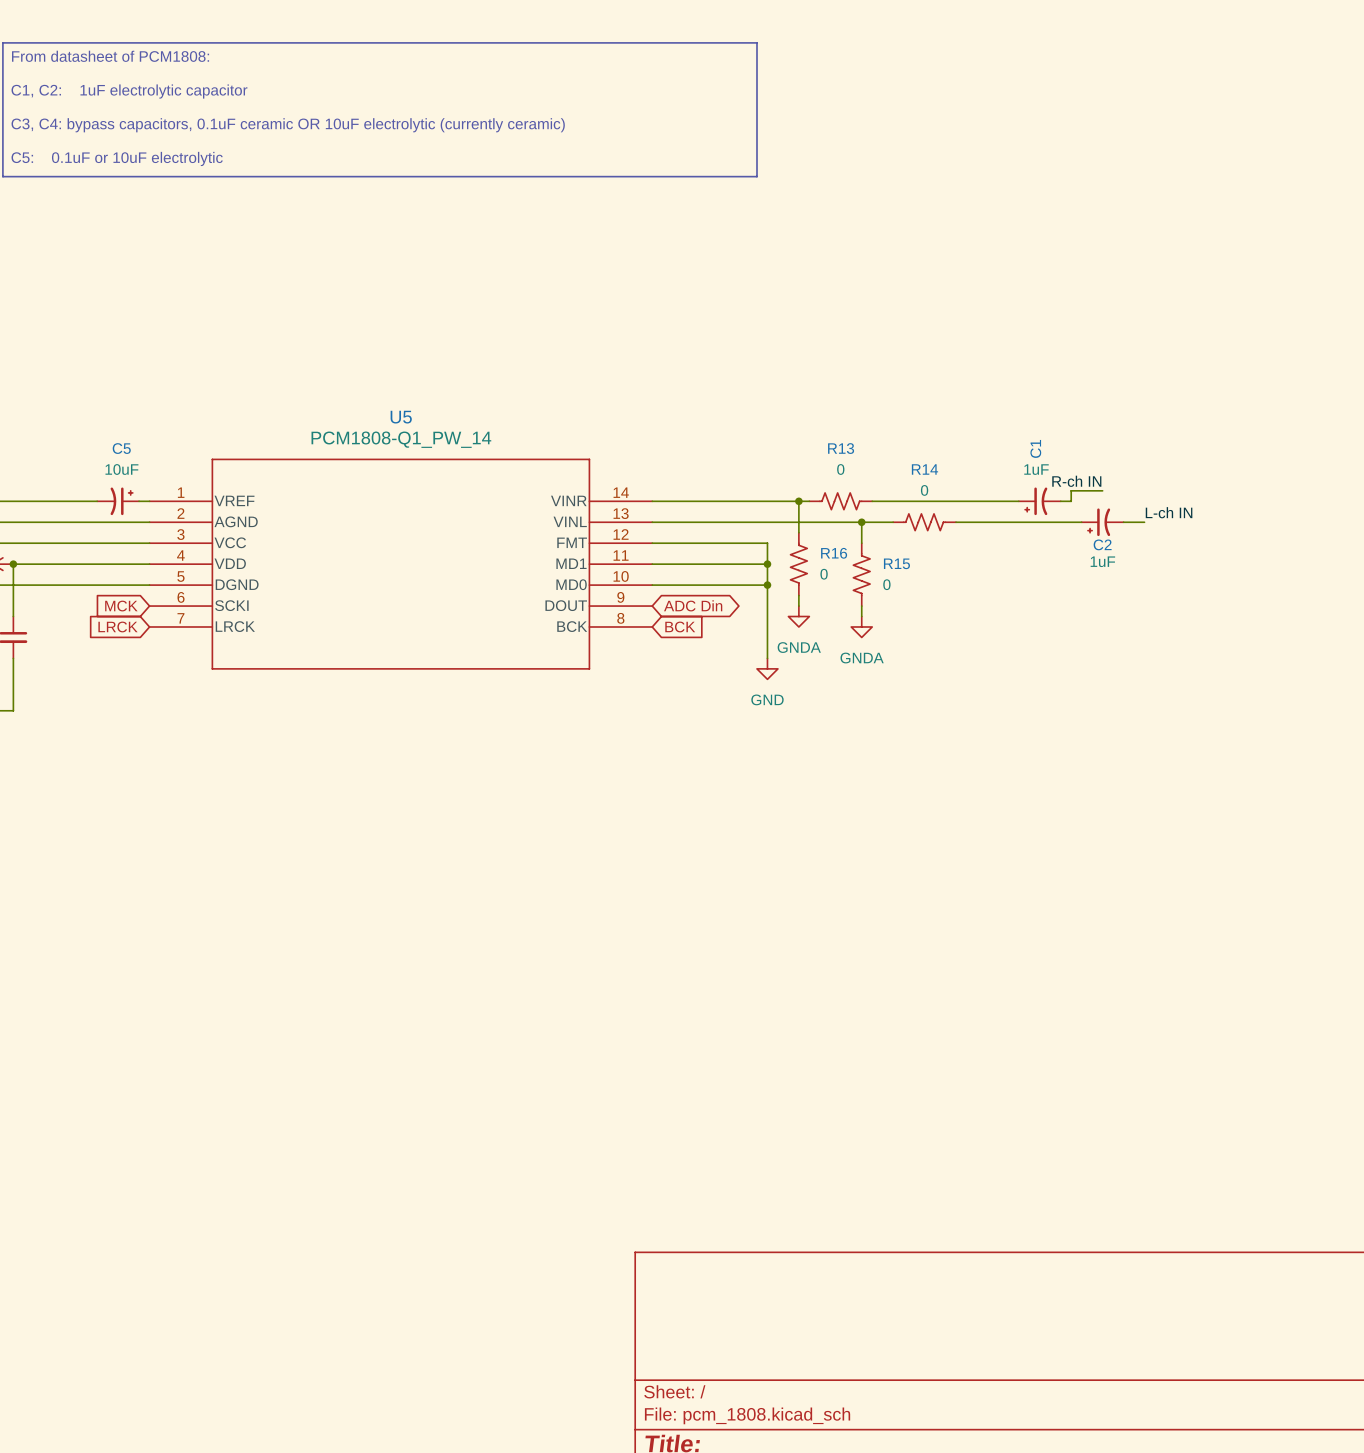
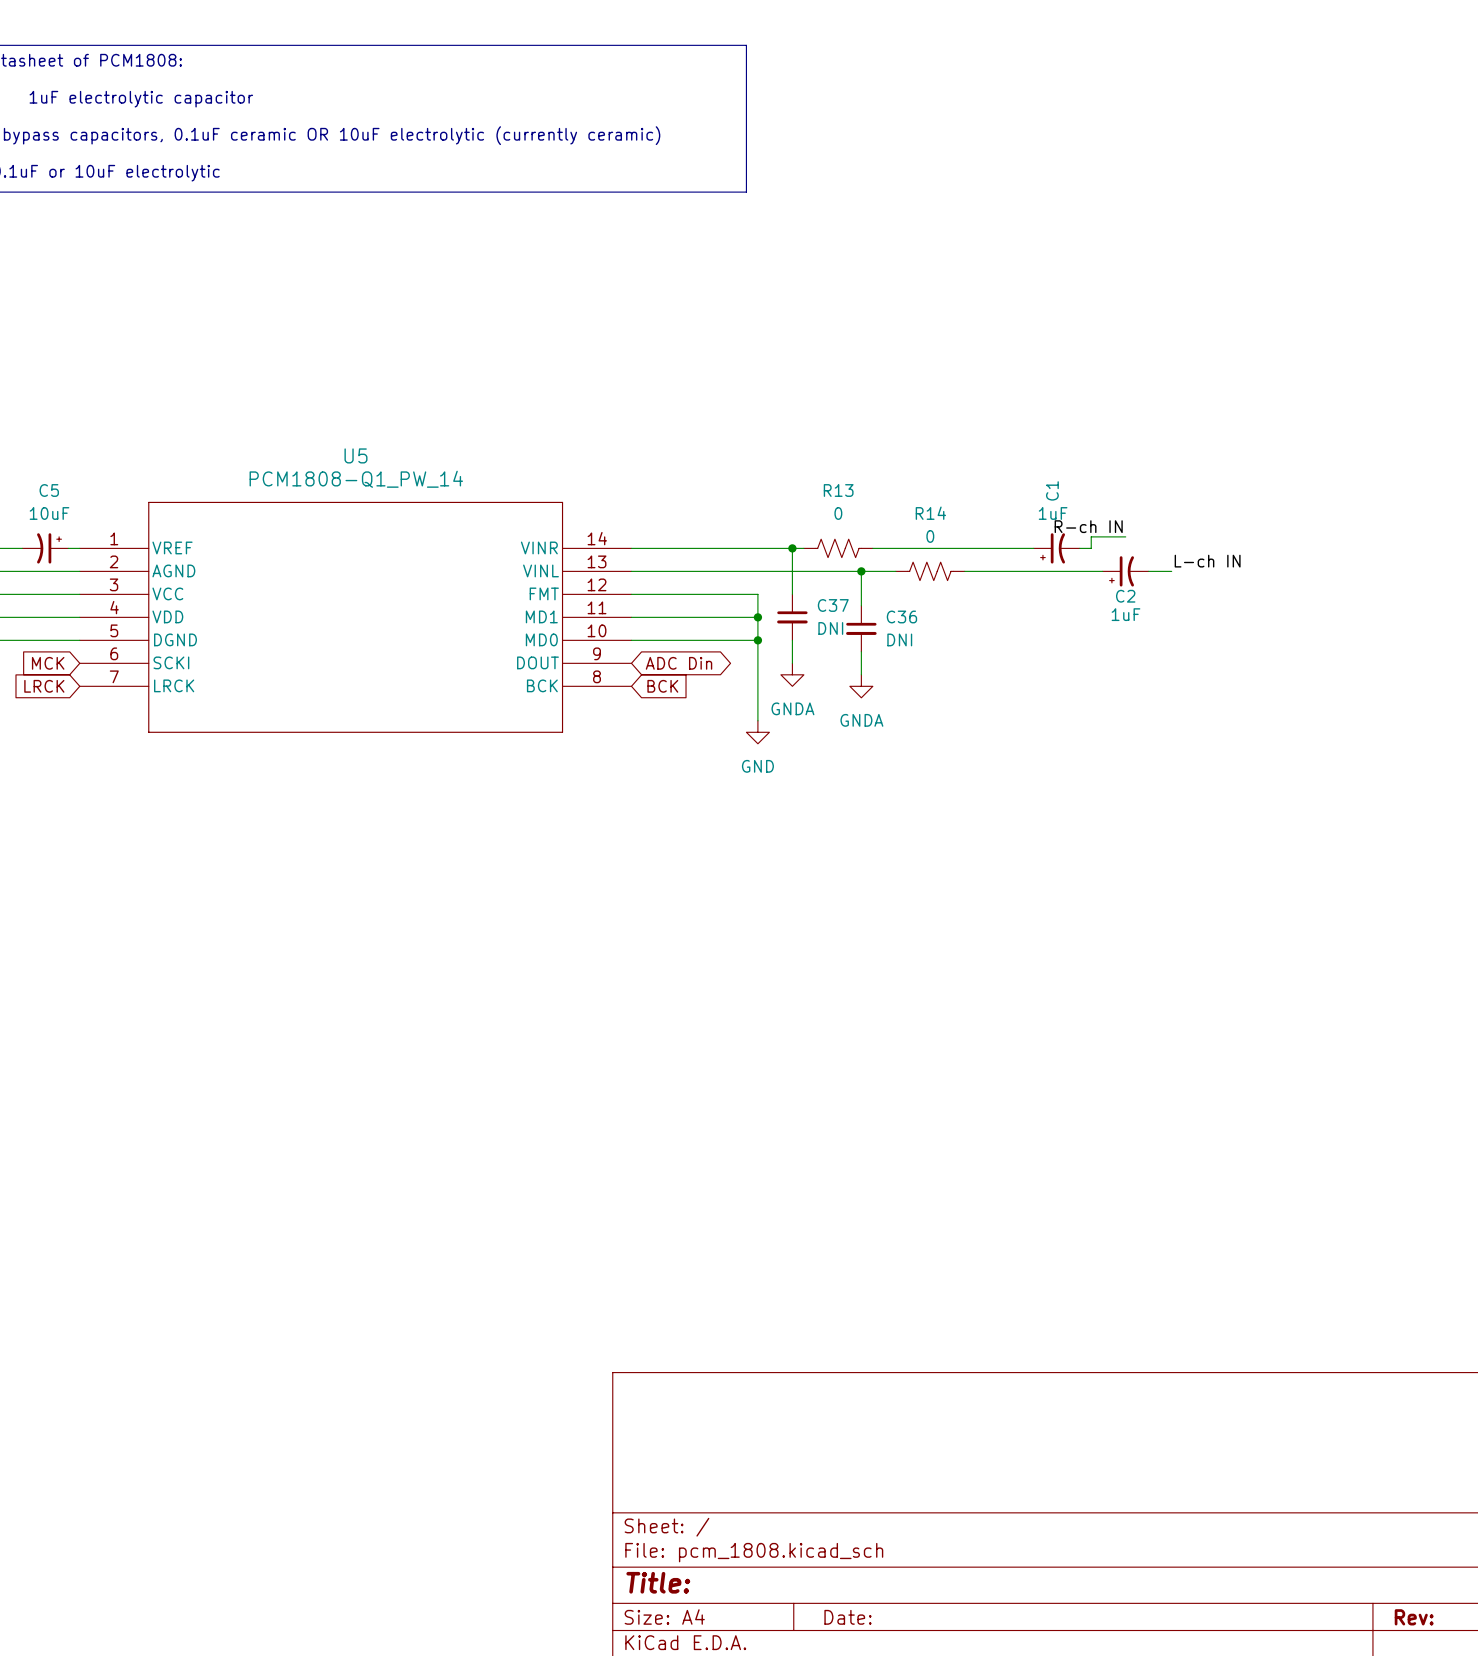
R16: 0 (798, 564) -> none
C37: none -> DNI (792, 617)
R15: 0 (861, 574) -> none
C36: none -> DNI (861, 628)

